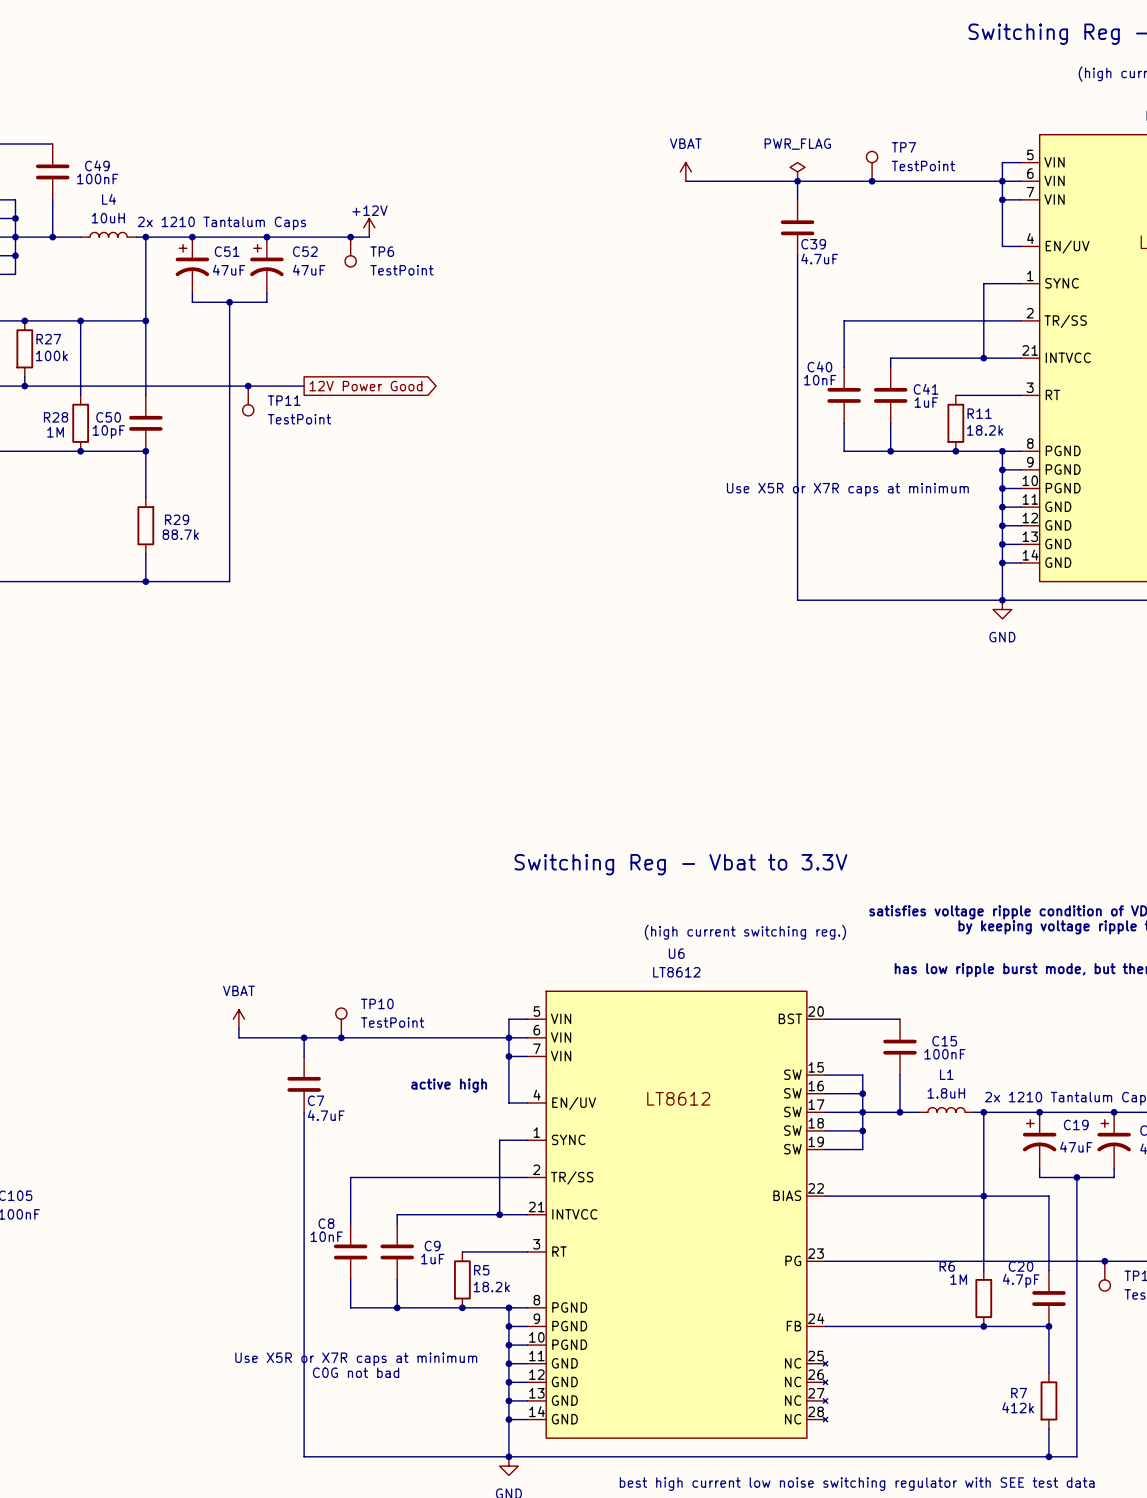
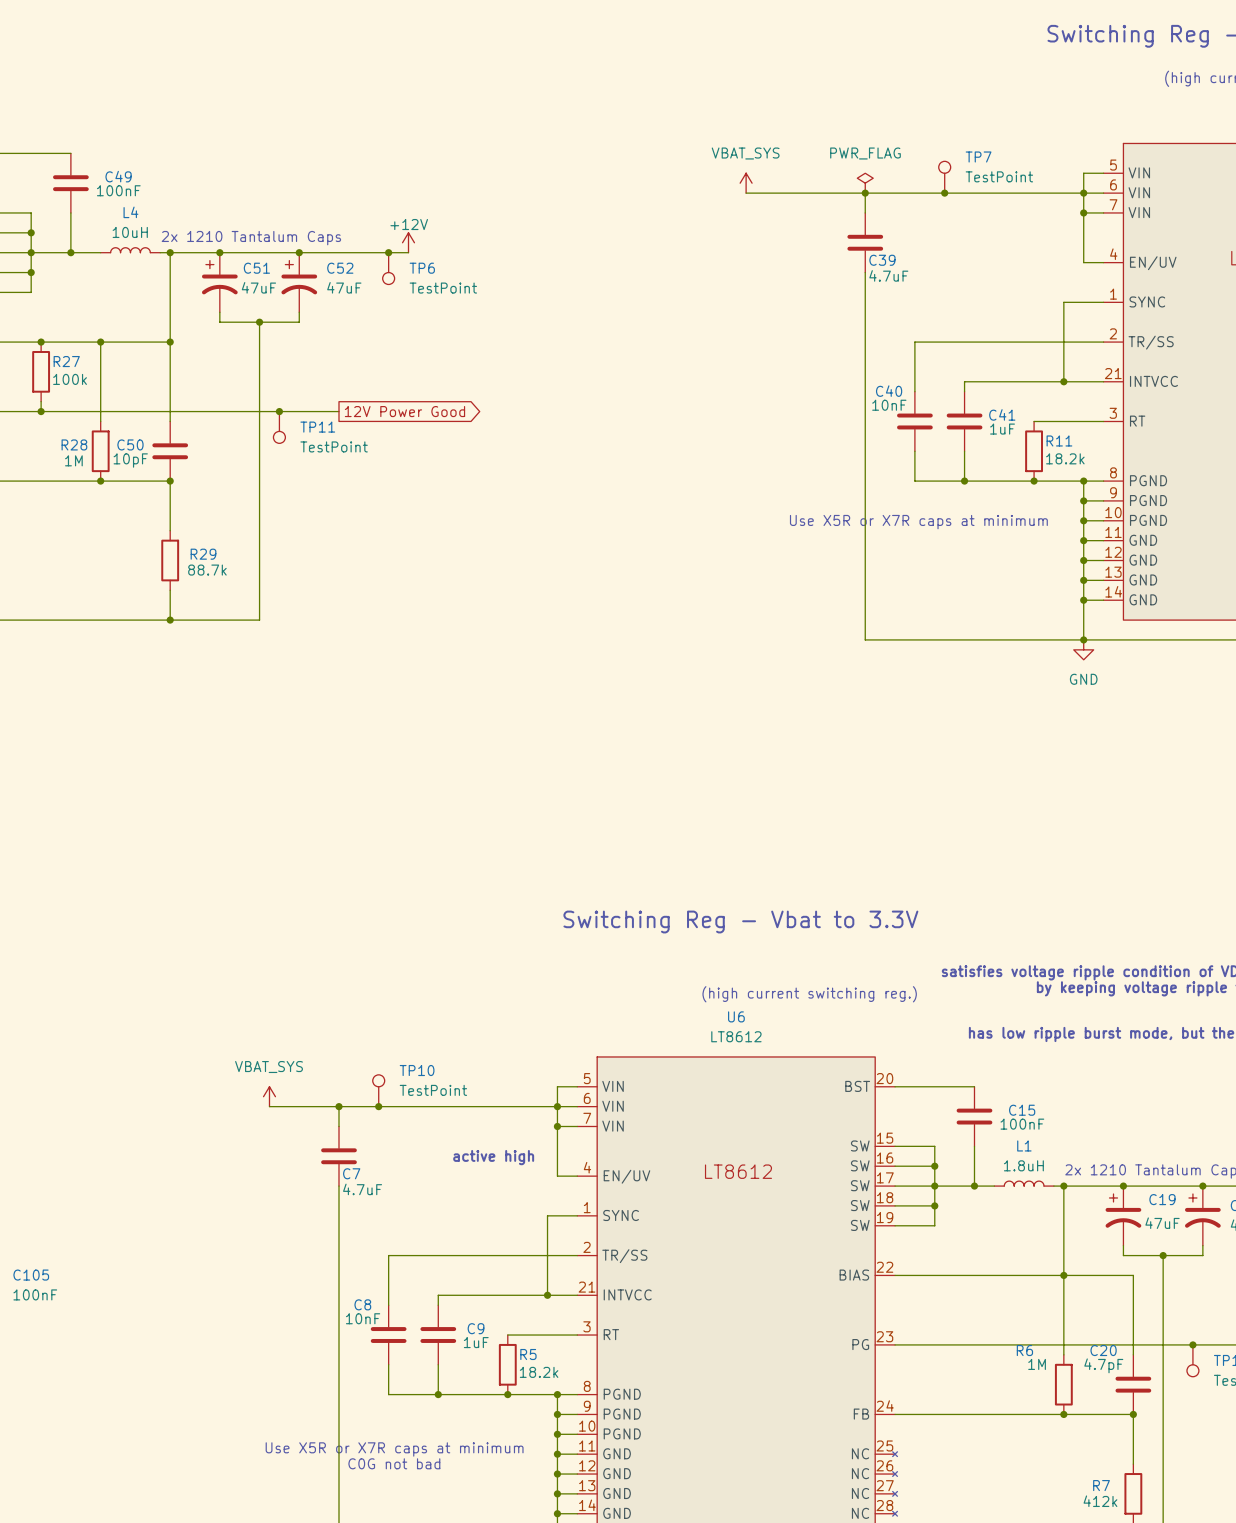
power symbol: VBAT (685, 171) -> VBAT_SYS (746, 183)
power symbol: VBAT (238, 1019) -> none
power symbol: none -> VBAT_SYS (269, 1096)

